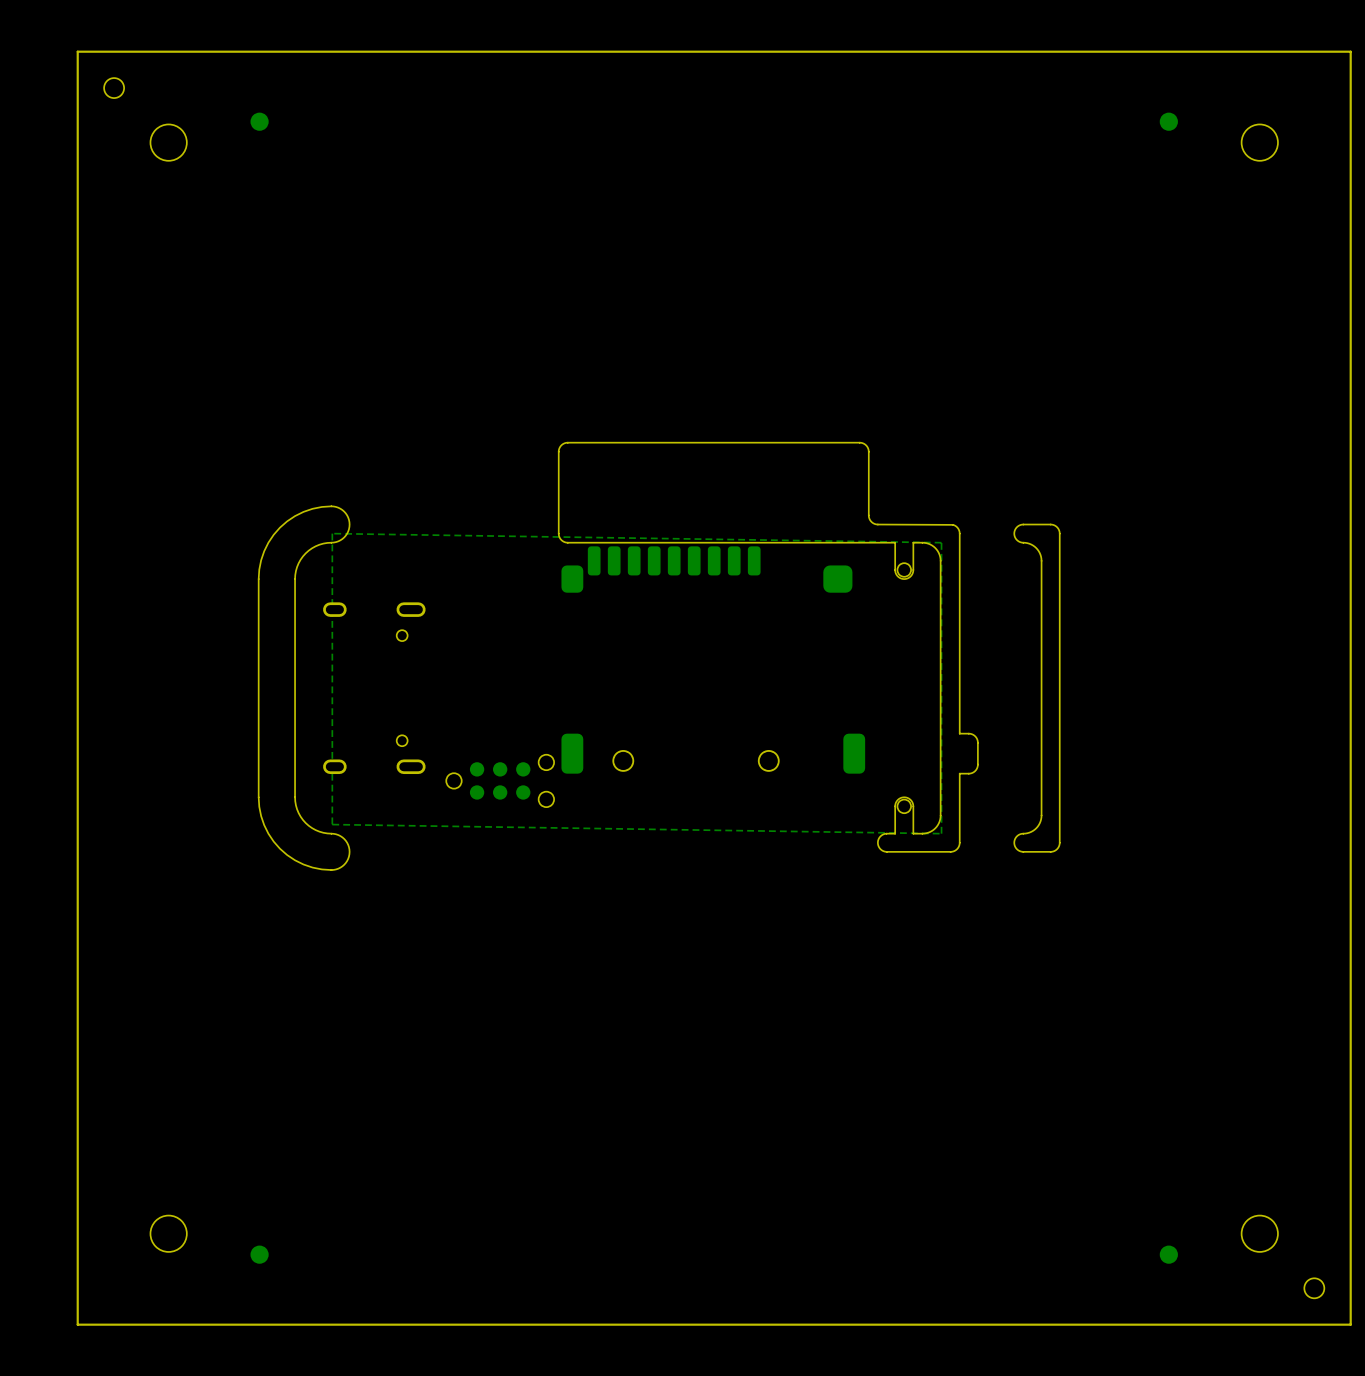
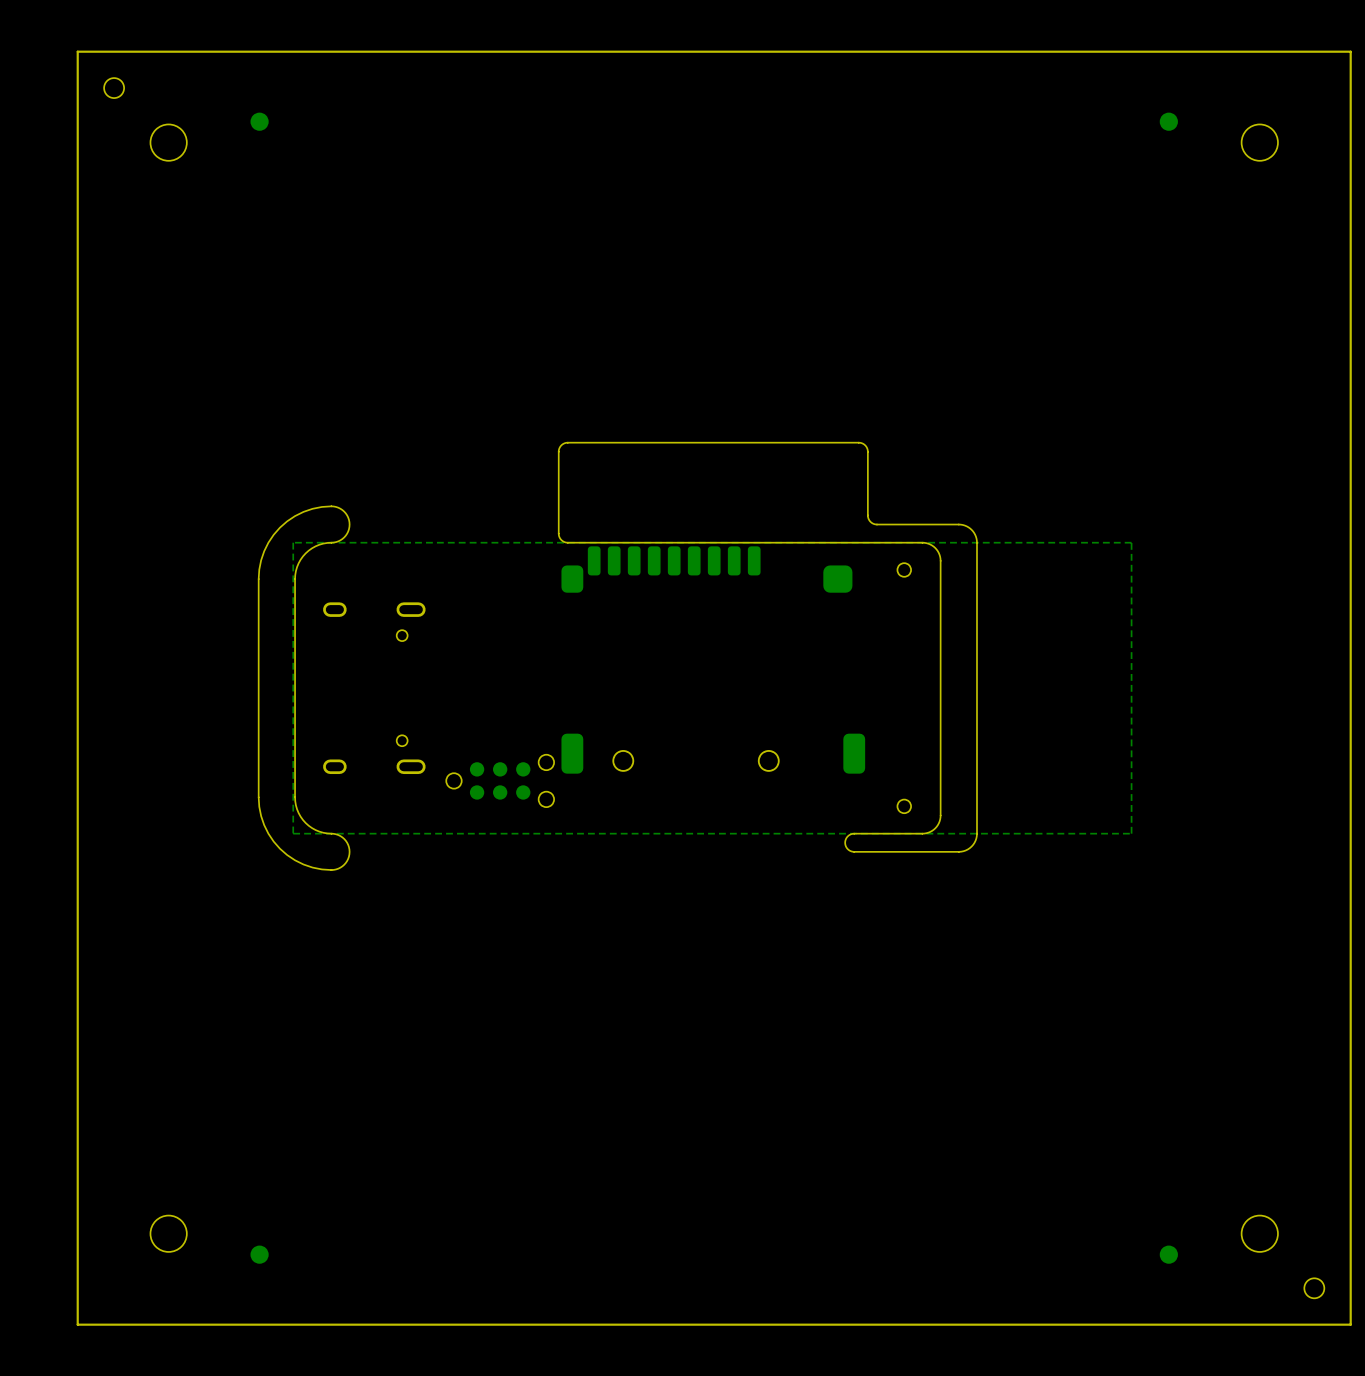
board edge: (858, 442) (865, 444) (868, 450) (868, 515) (872, 522) (877, 524) (953, 524) (959, 530) (959, 733) (972, 734) (977, 741) (976, 769) (971, 773) (959, 773) (959, 842) (957, 849) (950, 851) (884, 851) (879, 848) (877, 841) (880, 836) (886, 833) -> (858, 442) (864, 444) (867, 450) (867, 515) (871, 522) (876, 524) (962, 524) (973, 531) (976, 540) (976, 838) (969, 848) (958, 851) (854, 851) (848, 849) (845, 845) (846, 838) (851, 833) (886, 833)
board edge: (1050, 524) (1021, 524) (1016, 527) (1014, 532) (1017, 540) (1029, 543) (1036, 548) (1041, 560) (1041, 817) (1034, 829) (1019, 834) (1015, 838) (1015, 847) (1022, 851) (1053, 851) (1057, 849) (1059, 843) (1059, 533) (1057, 527) (1050, 524) -> none
zone outline: (332, 533) (941, 542) (941, 833) (332, 824) (332, 533) -> (1131, 542) (1131, 833) (293, 833) (293, 542) (1131, 542)
board edge: (913, 542) (913, 572) (909, 577) (904, 579) (898, 577) (895, 572) (895, 542) -> (913, 542) (895, 542)
board edge: (913, 833) (913, 804) (909, 799) (904, 797) (898, 799) (895, 804) (895, 833) -> (913, 833) (895, 833)

